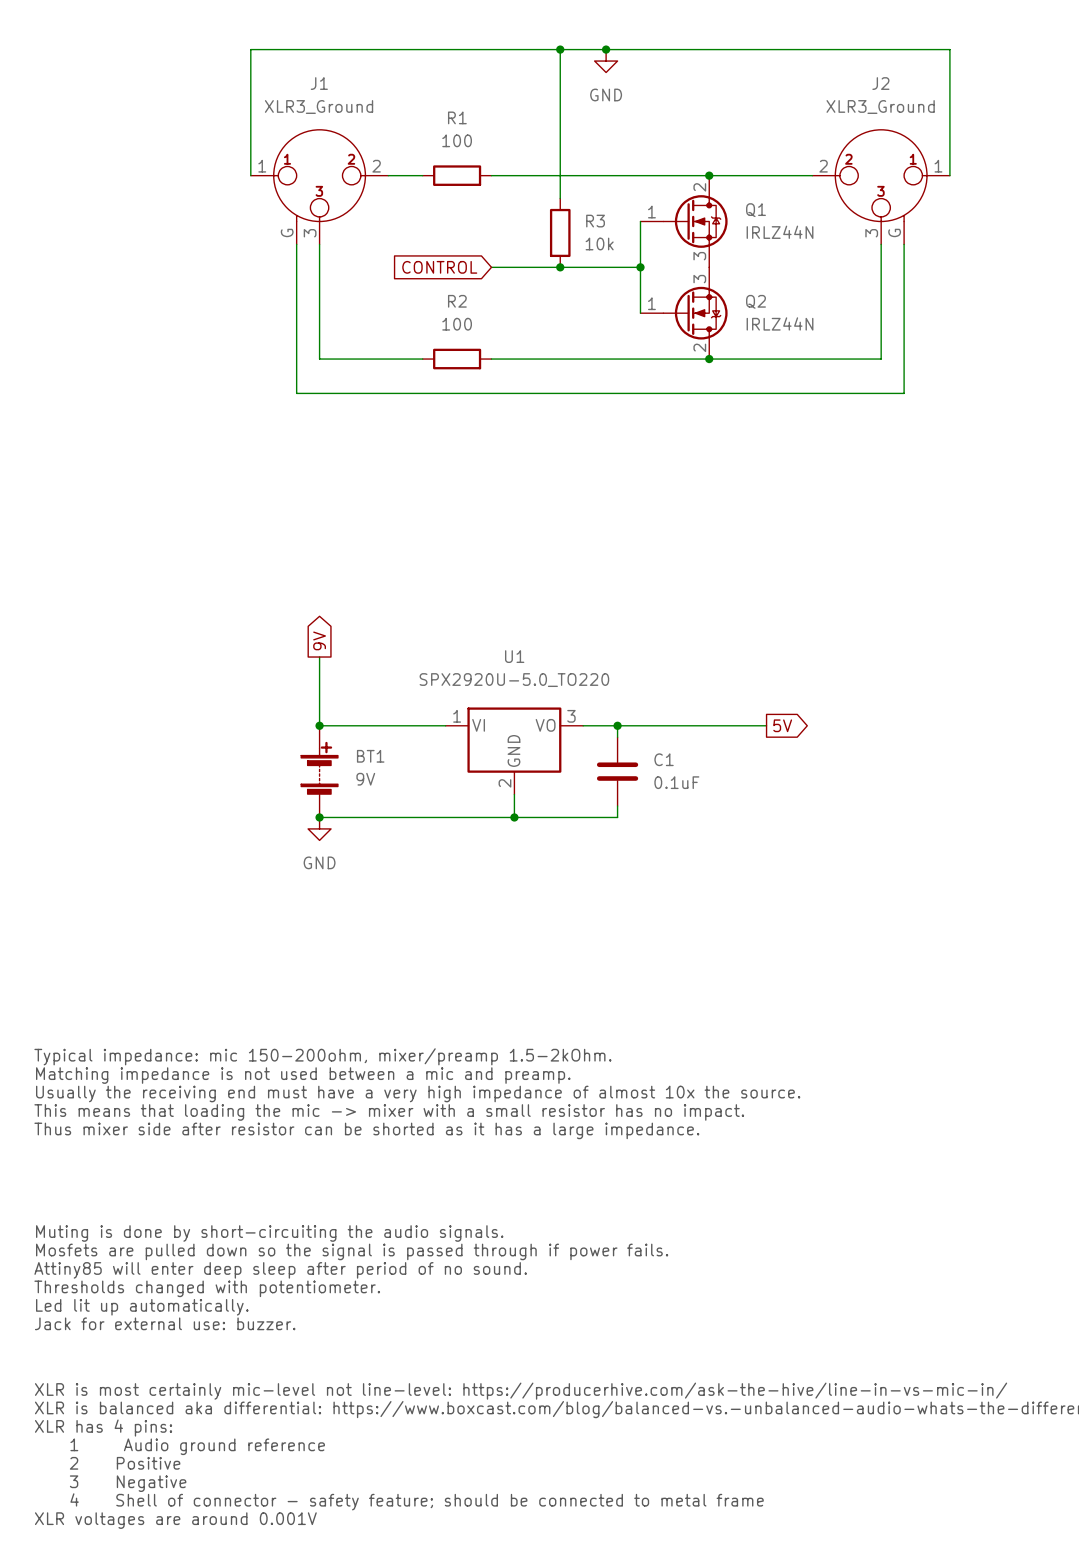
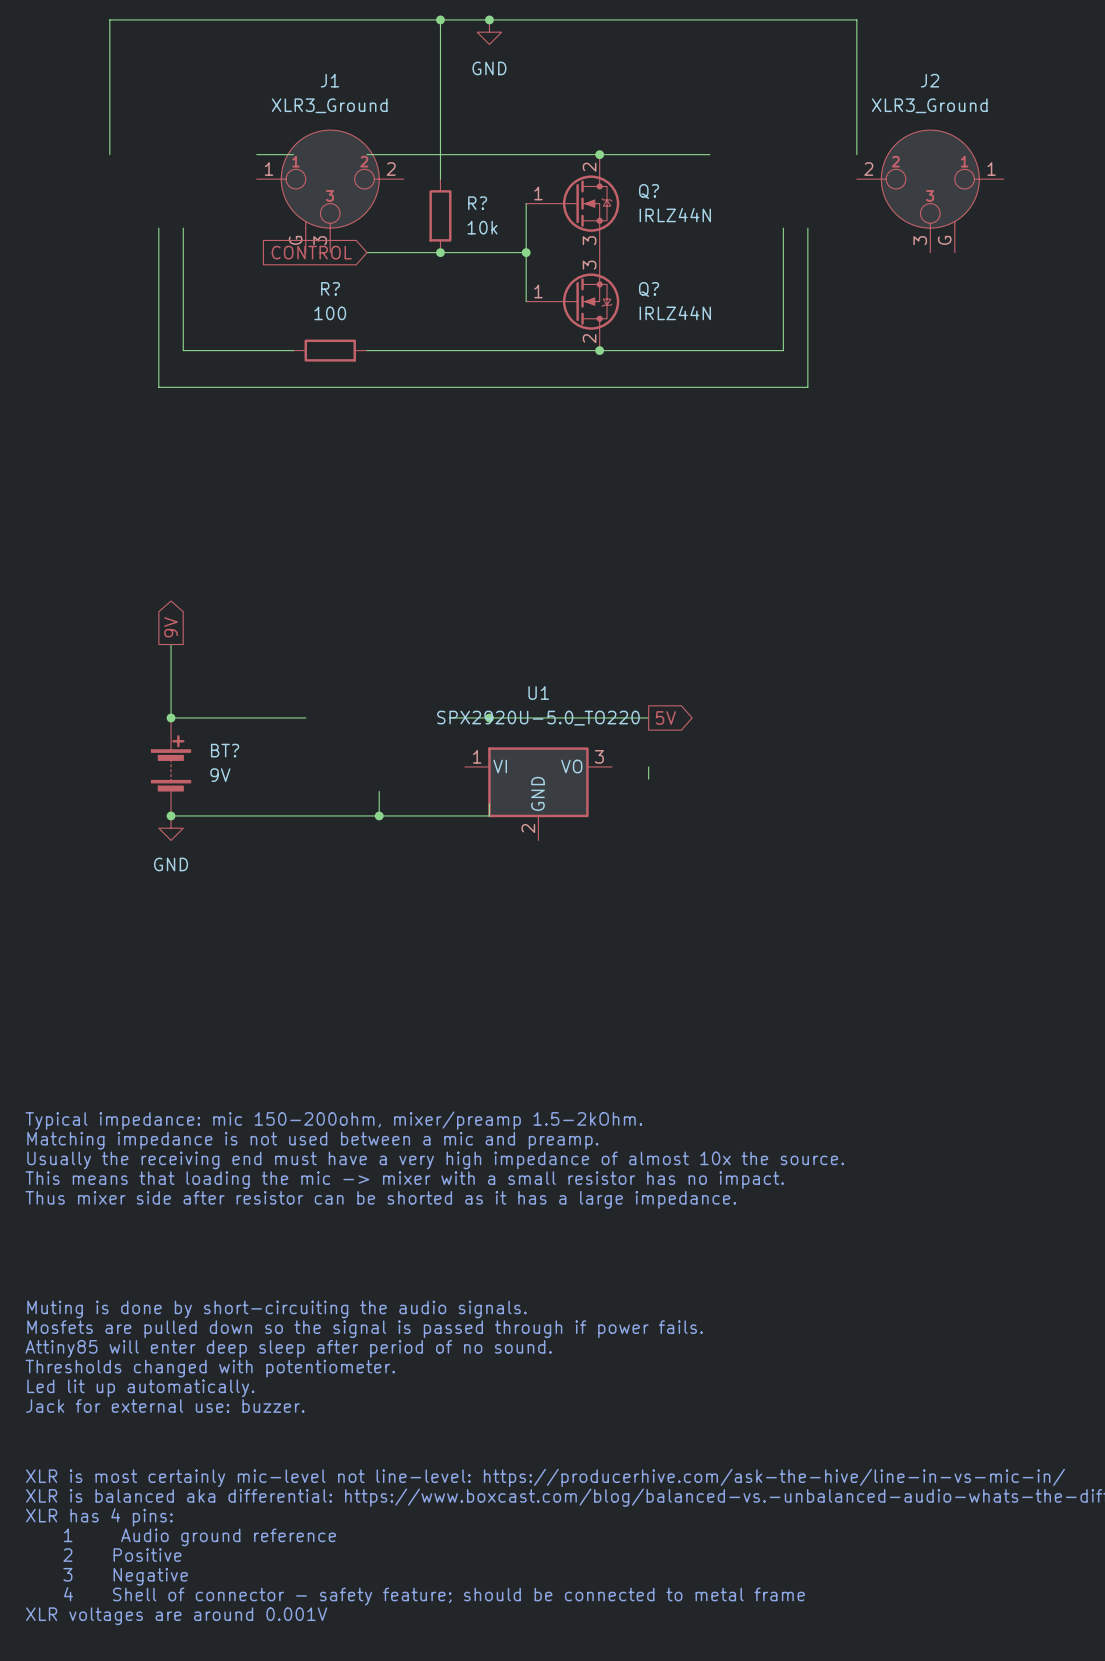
junction: none -> (440, 19)
junction: none -> (489, 19)
wire: (560, 49) (560, 198) -> none
junction: (560, 49) -> none
junction: (606, 49) -> none
power symbol position: GND (606, 61) -> GND (489, 32)
wire: none -> (256, 154) (293, 154)
junction: none -> (599, 154)
wire: (250, 175) (250, 49) (949, 49) (949, 175) -> (109, 154) (109, 19) (856, 19) (856, 154)
wire: (388, 175) (422, 175) -> (440, 19) (440, 179)
R1: 100 (457, 175) -> none
wire: (491, 175) (812, 175) -> (366, 154) (709, 154)
junction: (709, 175) -> none
Q?: none -> IRLZ44N (572, 203)
R?: none -> 10k (440, 215)
wire: (640, 221) (640, 313) -> (526, 203) (526, 301)
Q1: IRLZ44N (684, 221) -> none
R3: 10k (560, 232) -> none
wire: (296, 244) (296, 393) (904, 393) (904, 244) -> (158, 228) (158, 387) (807, 387) (807, 228)
wire: (319, 244) (319, 359) (422, 359) -> (183, 228) (183, 350) (293, 350)
junction: none -> (440, 252)
junction: none -> (526, 252)
wire: (881, 244) (881, 359) (491, 359) -> (783, 228) (783, 350) (366, 350)
global label position: CONTROL (439, 267) -> CONTROL (311, 252)
wire: (491, 267) (640, 267) -> (366, 252) (526, 252)
junction: (560, 267) -> none
junction: (640, 267) -> none
Q?: none -> IRLZ44N (572, 301)
Q2: IRLZ44N (684, 313) -> none
R?: none -> 100 (330, 350)
junction: none -> (599, 350)
R2: 100 (457, 359) -> none
junction: (709, 359) -> none
global label position: 9V (319, 640) -> 9V (171, 627)
wire: (319, 657) (319, 725) (445, 725) -> (171, 644) (171, 717) (305, 717)
junction: none -> (171, 717)
junction: none -> (489, 717)
BT?: none -> 9V (171, 766)
junction: (319, 725) -> none
wire: (583, 725) (766, 725) -> (452, 717) (648, 717)
junction: (617, 725) -> none
global label position: 5V (782, 725) -> 5V (665, 717)
junction: none -> (171, 815)
BT1: 9V (319, 771) -> none
junction: none -> (379, 815)
C1: 0.1uF (617, 771) -> none
wire: (514, 794) (514, 817) -> (379, 791) (379, 815)
wire: (617, 806) (617, 817) (319, 817) -> (489, 803) (489, 815) (171, 815)
junction: (319, 817) -> none
junction: (514, 817) -> none
power symbol position: GND (319, 828) -> GND (171, 828)

